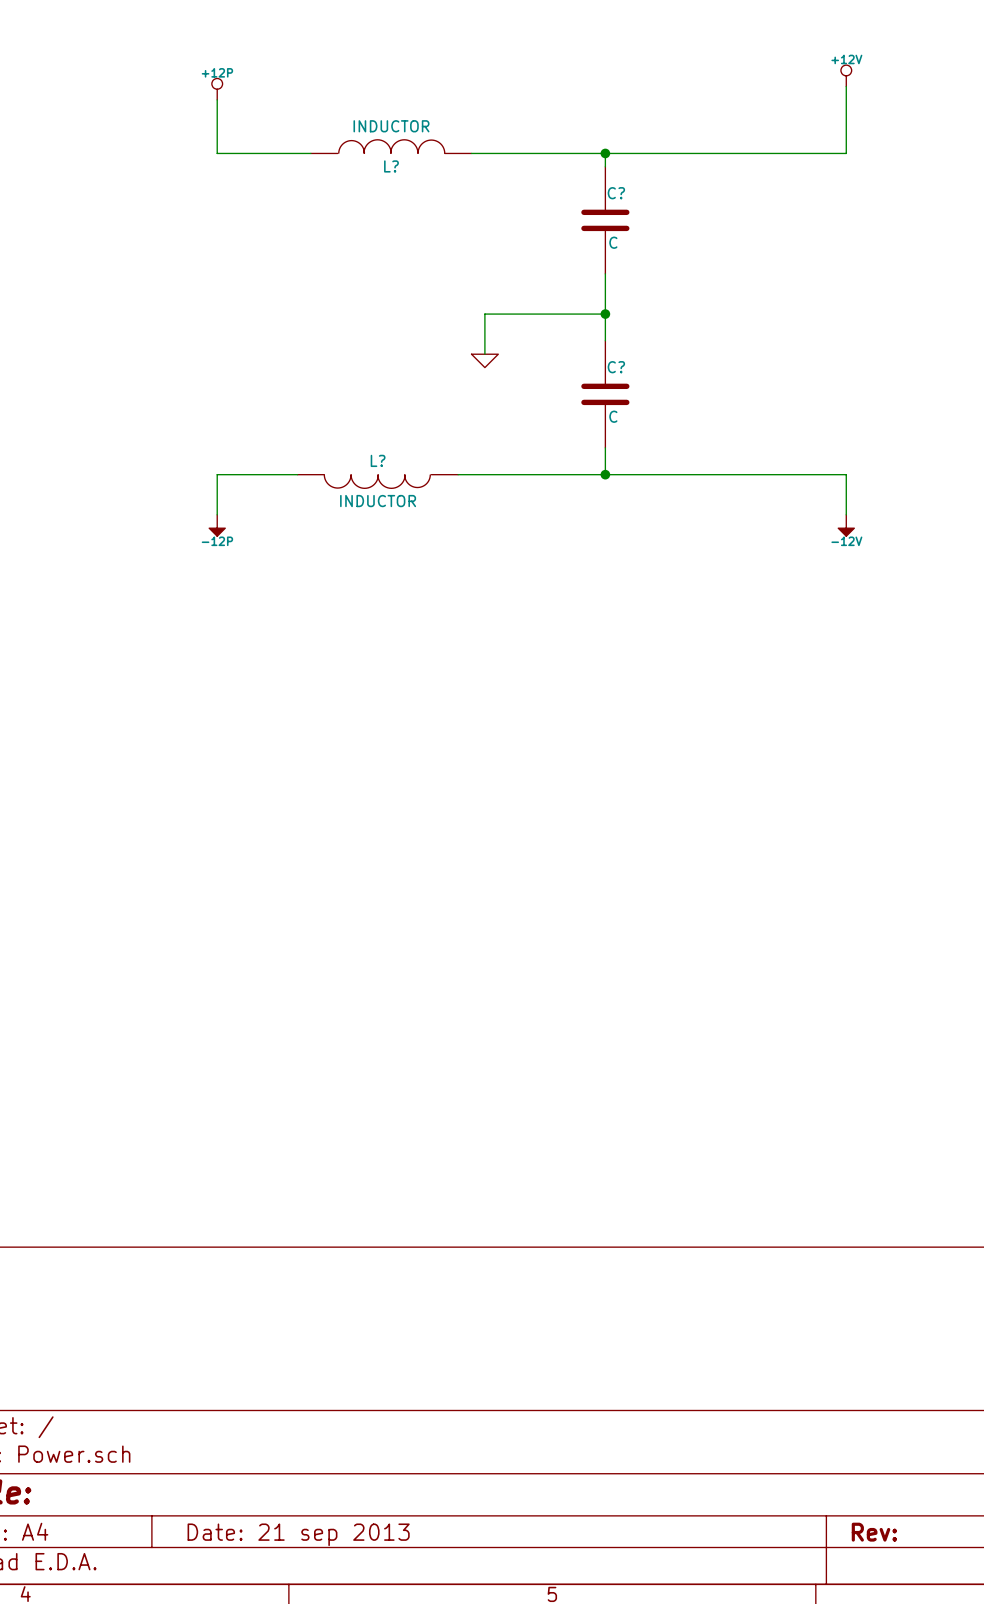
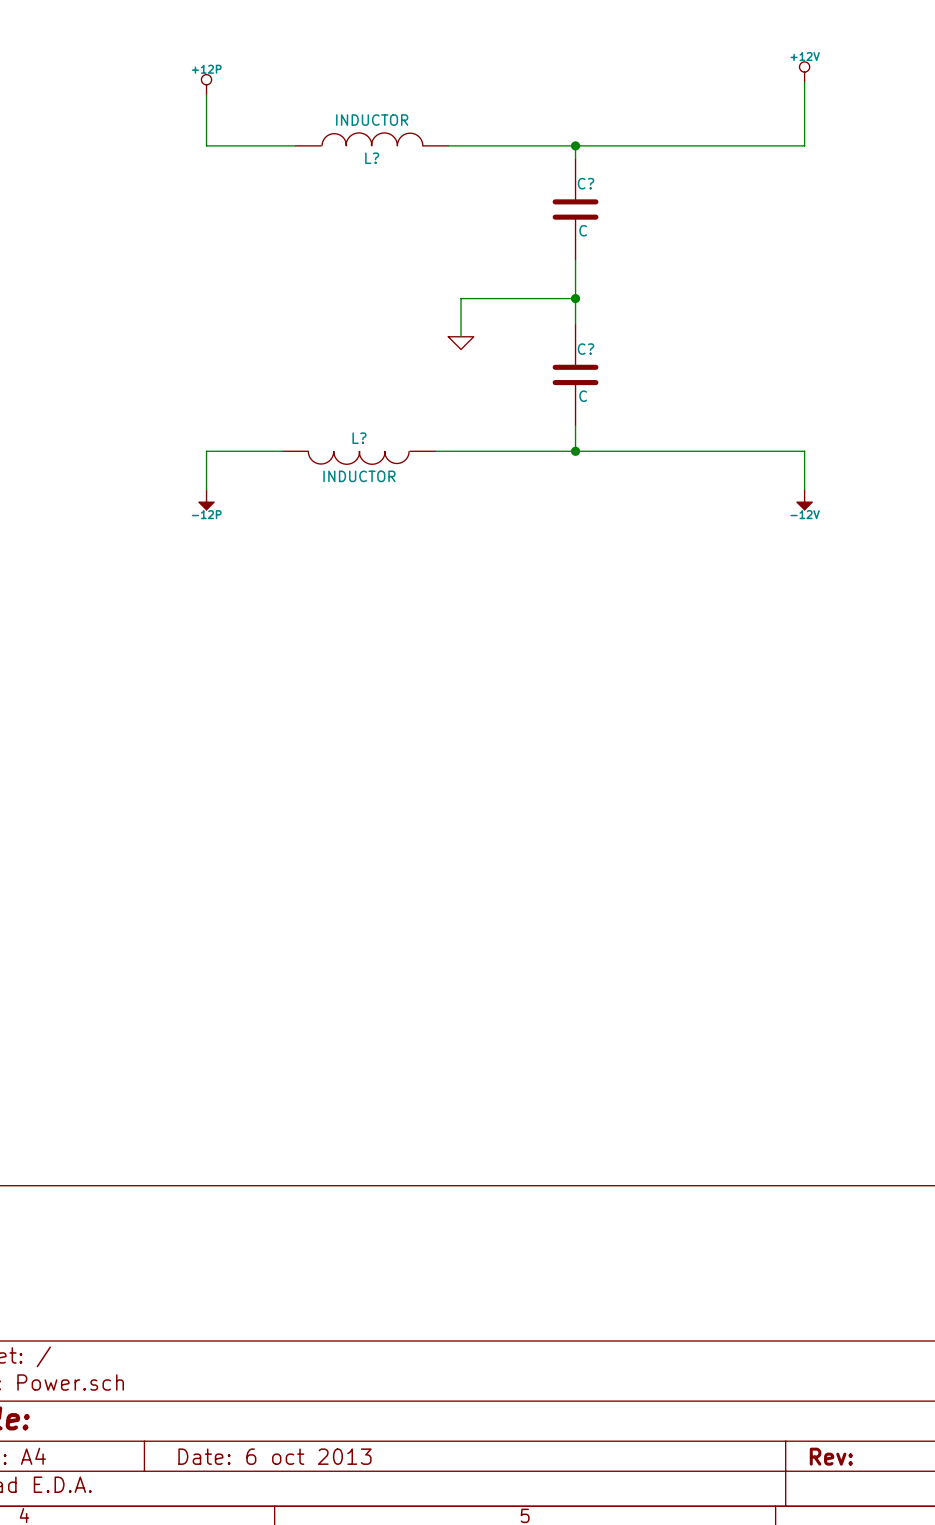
title block: Date: 21 sep 2013 (298, 1534) -> Date: 6 oct 2013 (274, 1456)

